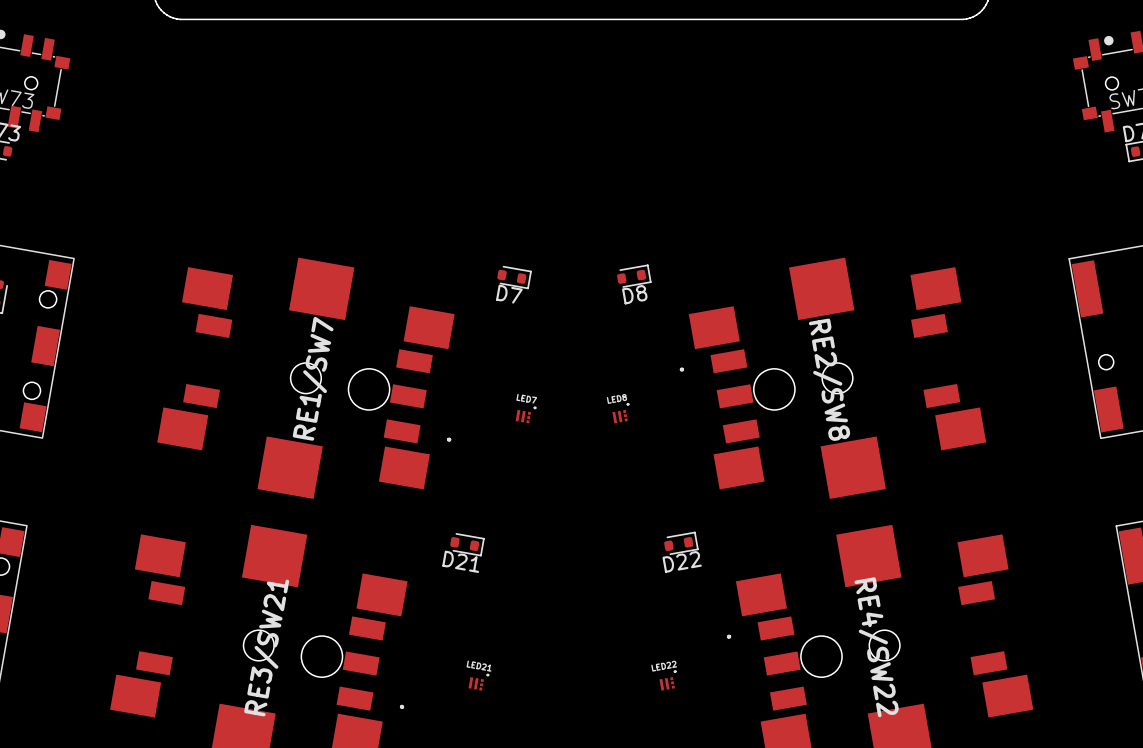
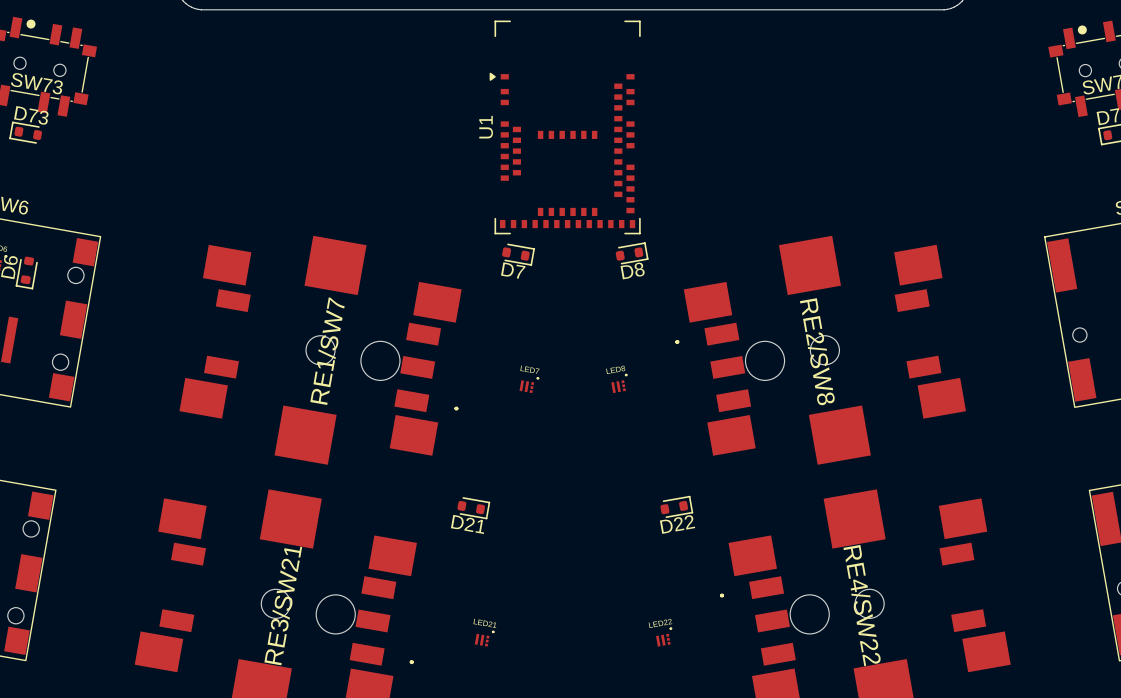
U1: none -> (565, 127)

